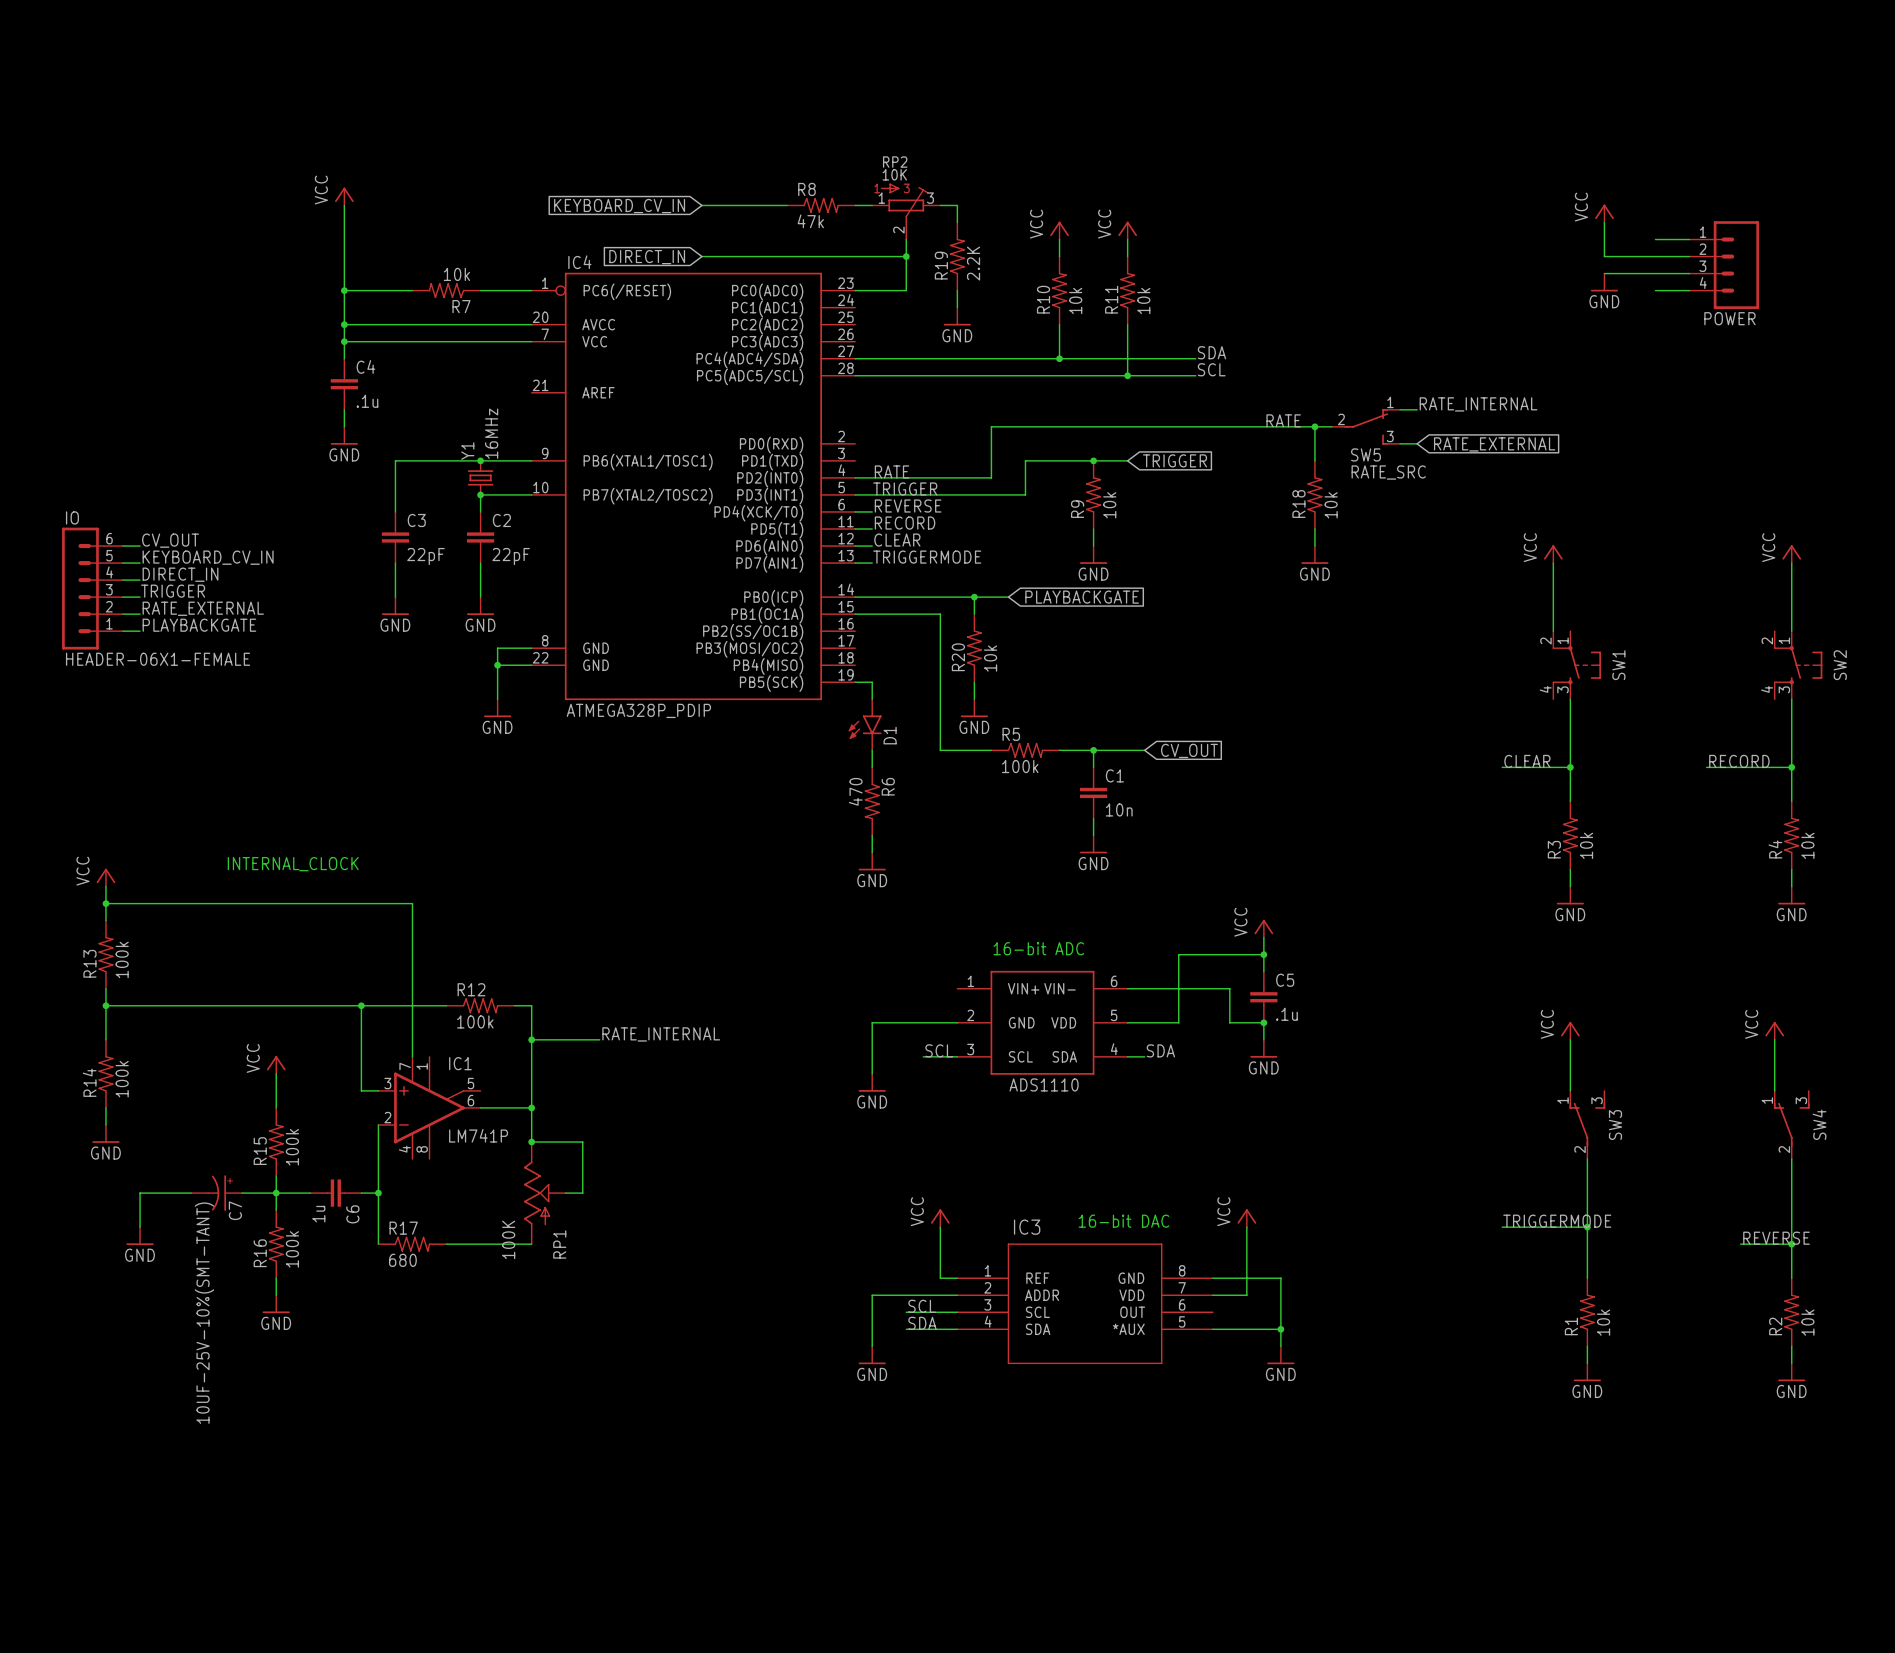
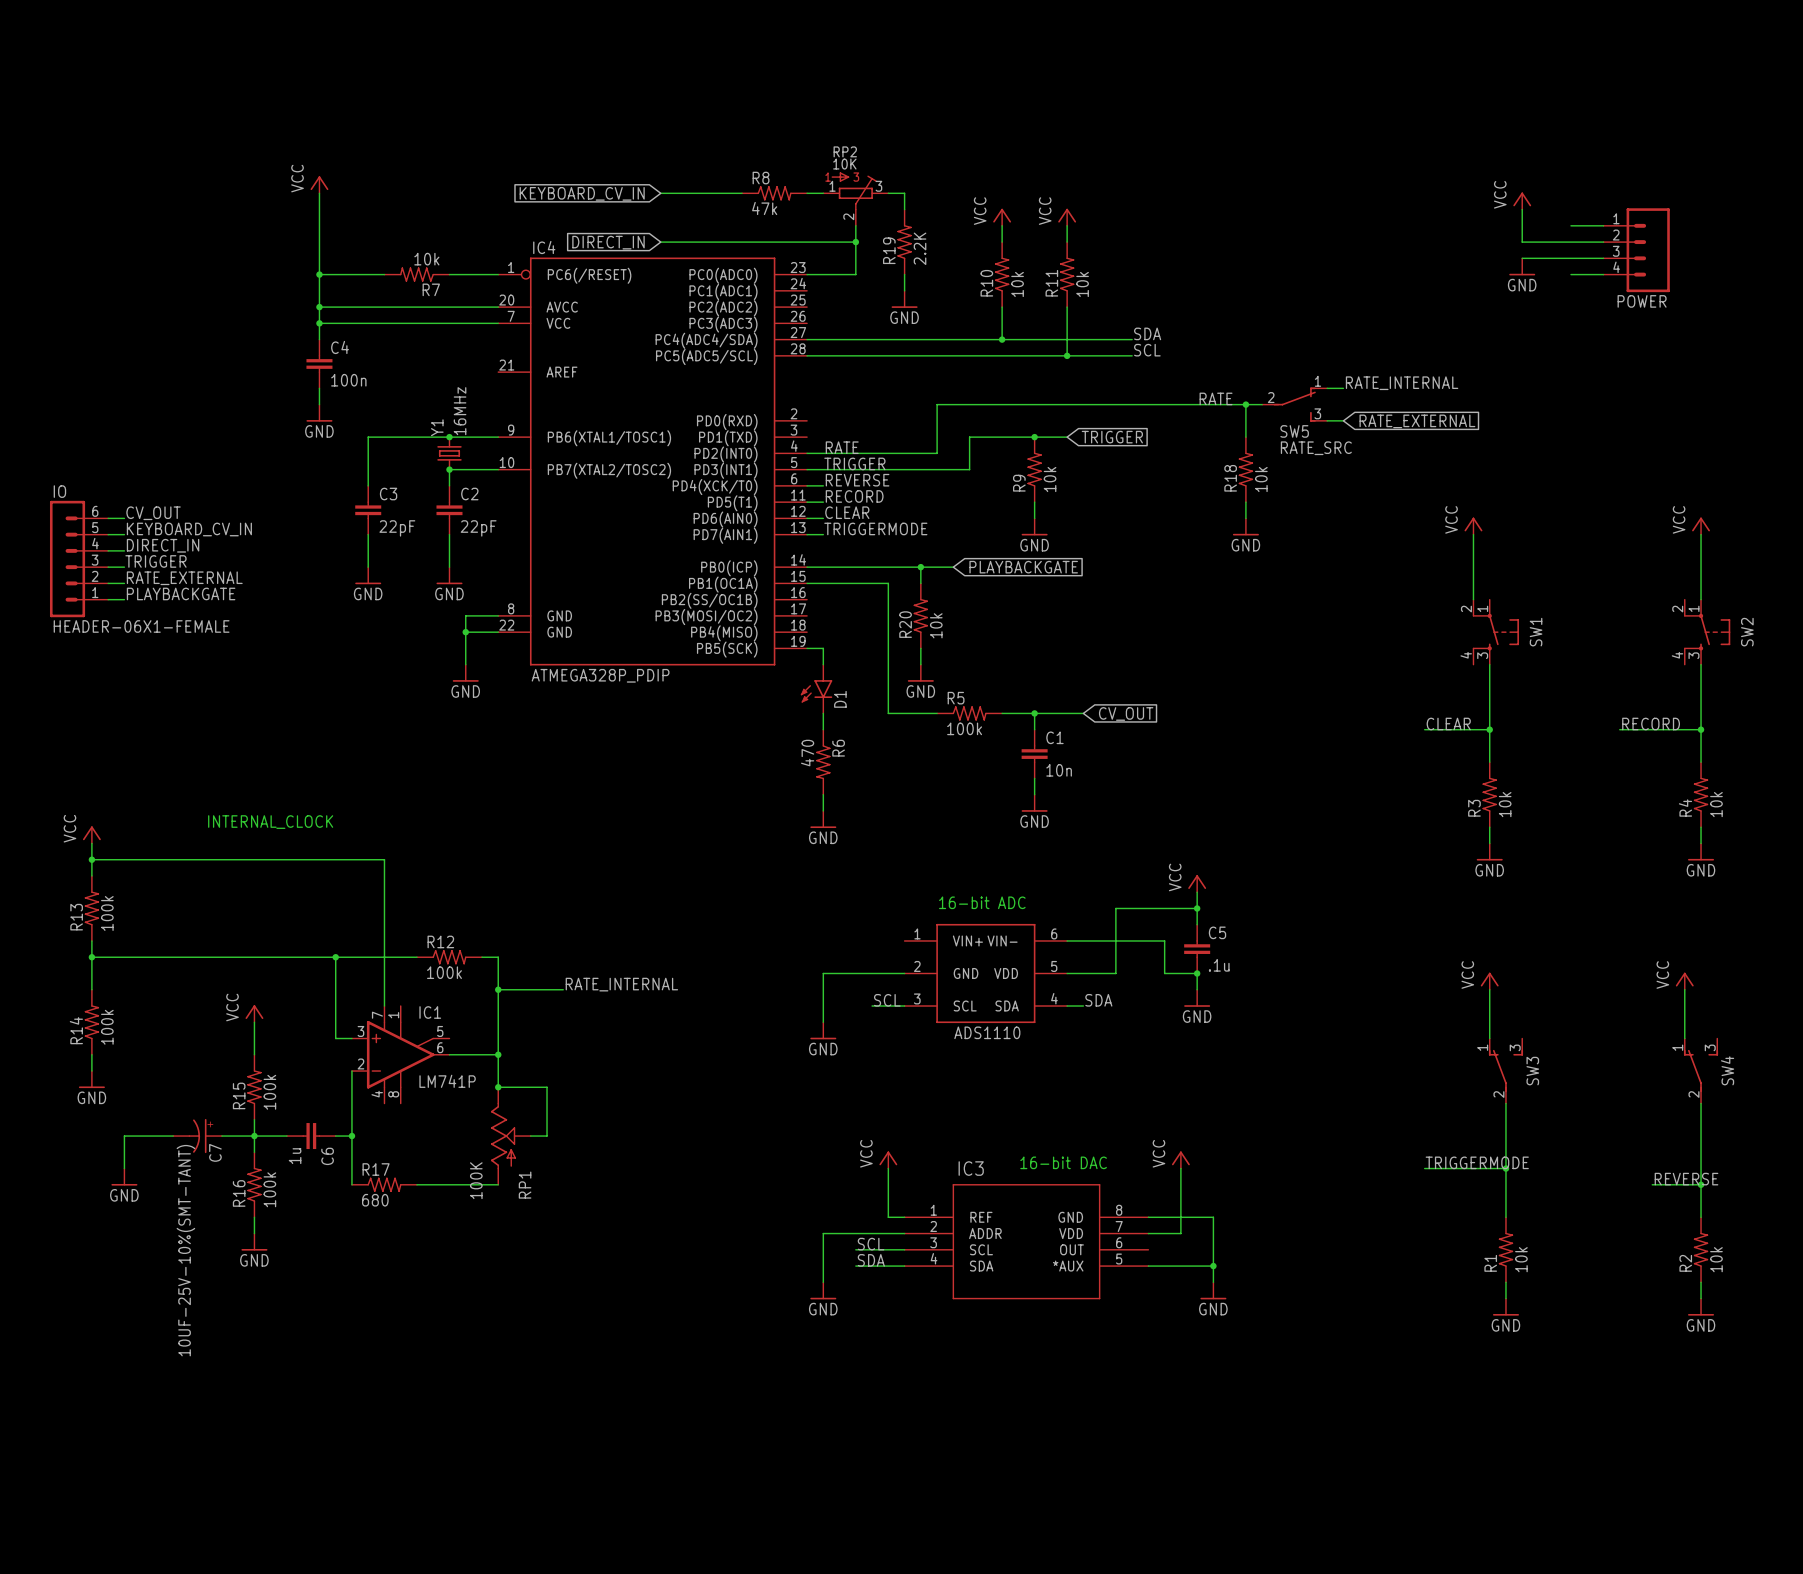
C4 value: .1u (367, 401) -> 100n (348, 380)

